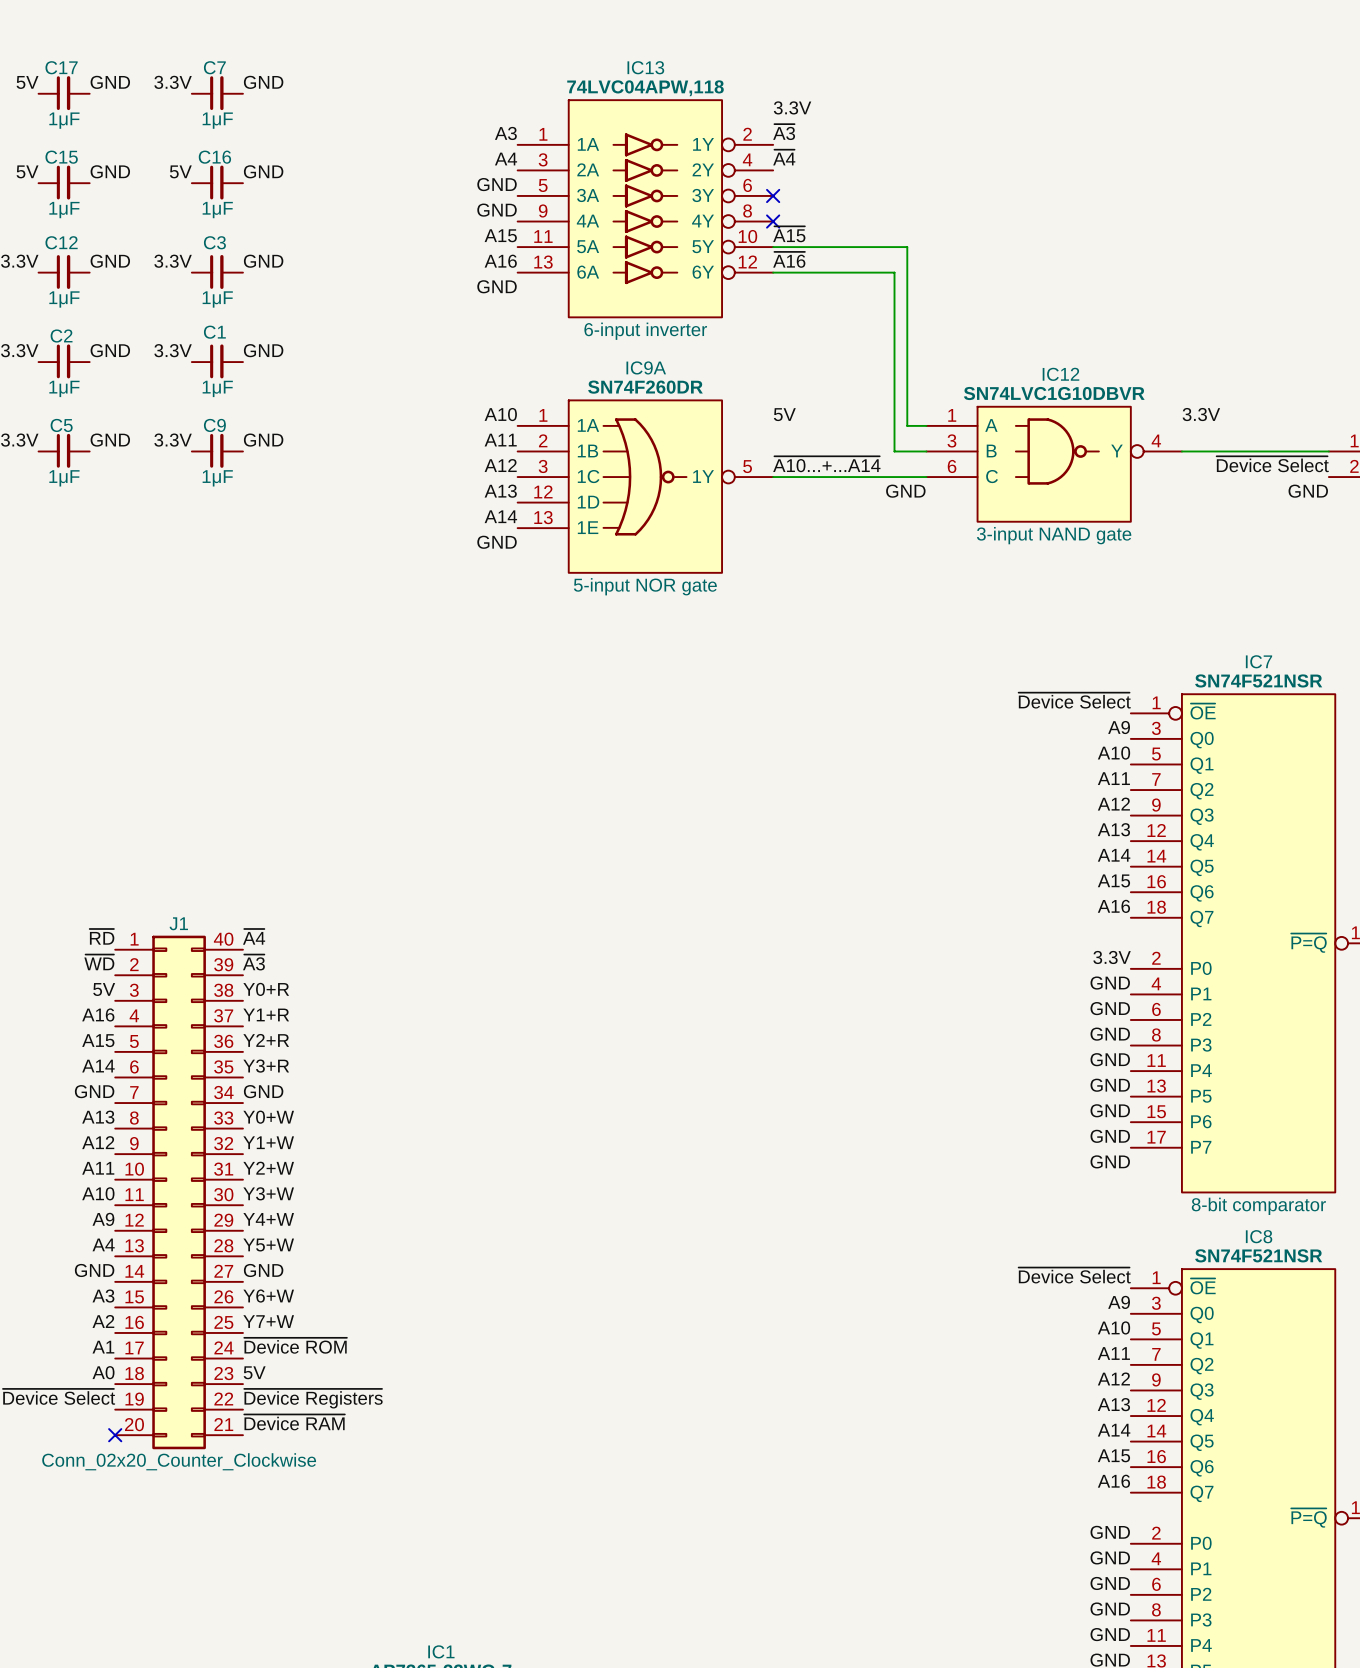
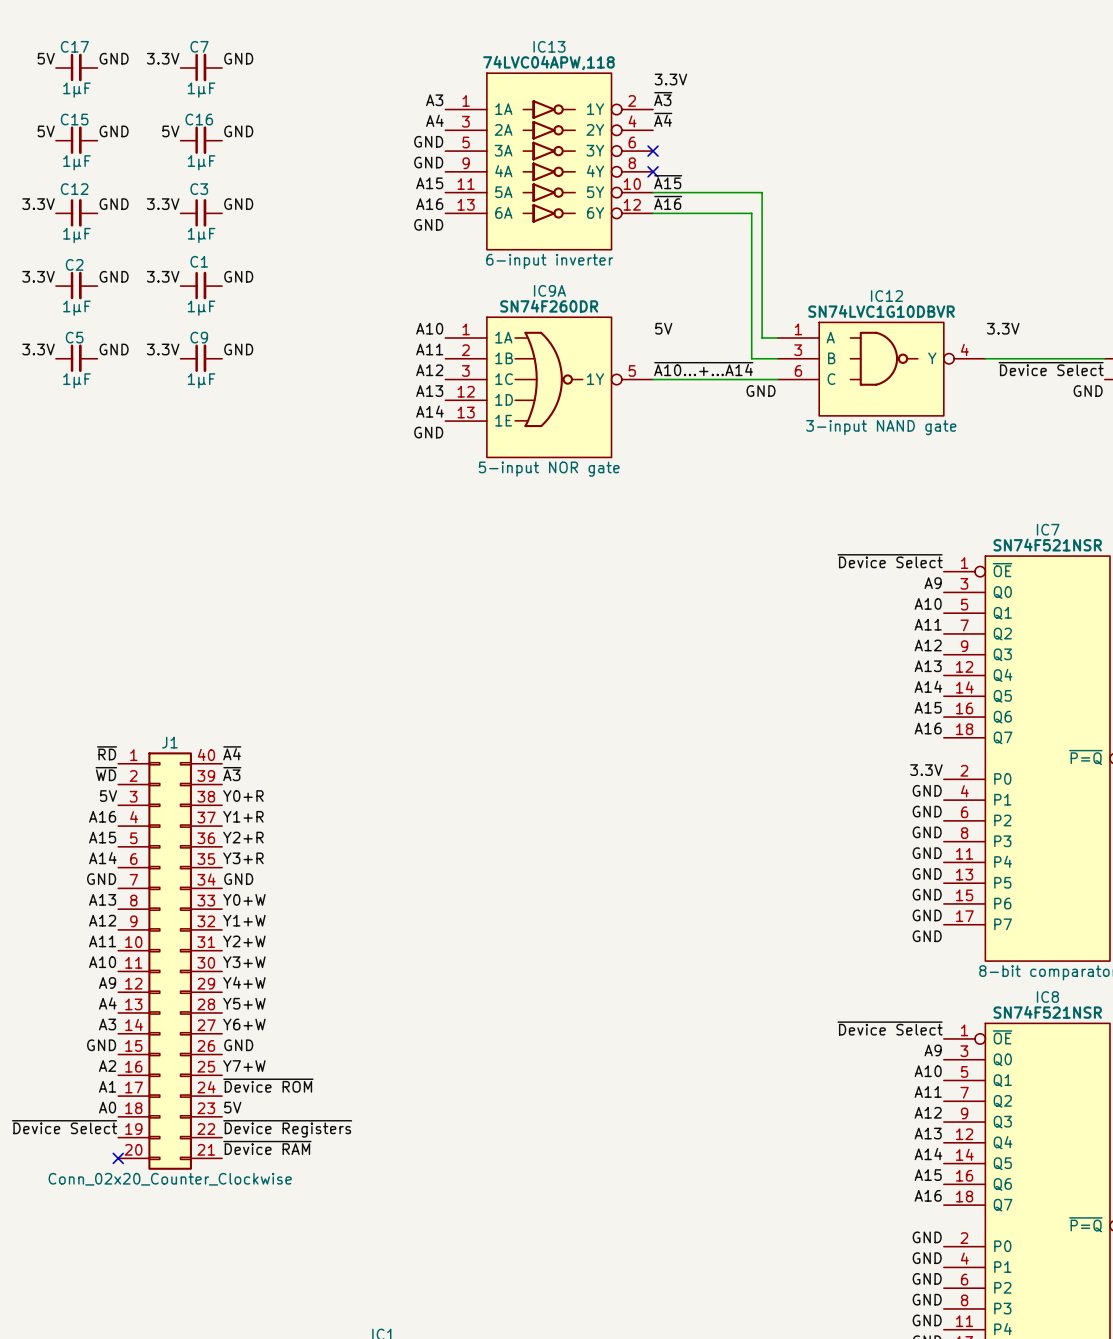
label: GND (94, 1270) -> A3 (107, 1024)
label: GND (263, 1270) -> Y6+W (244, 1024)
label: A3 (103, 1296) -> GND (101, 1045)
label: Y6+W (268, 1296) -> GND (238, 1045)

